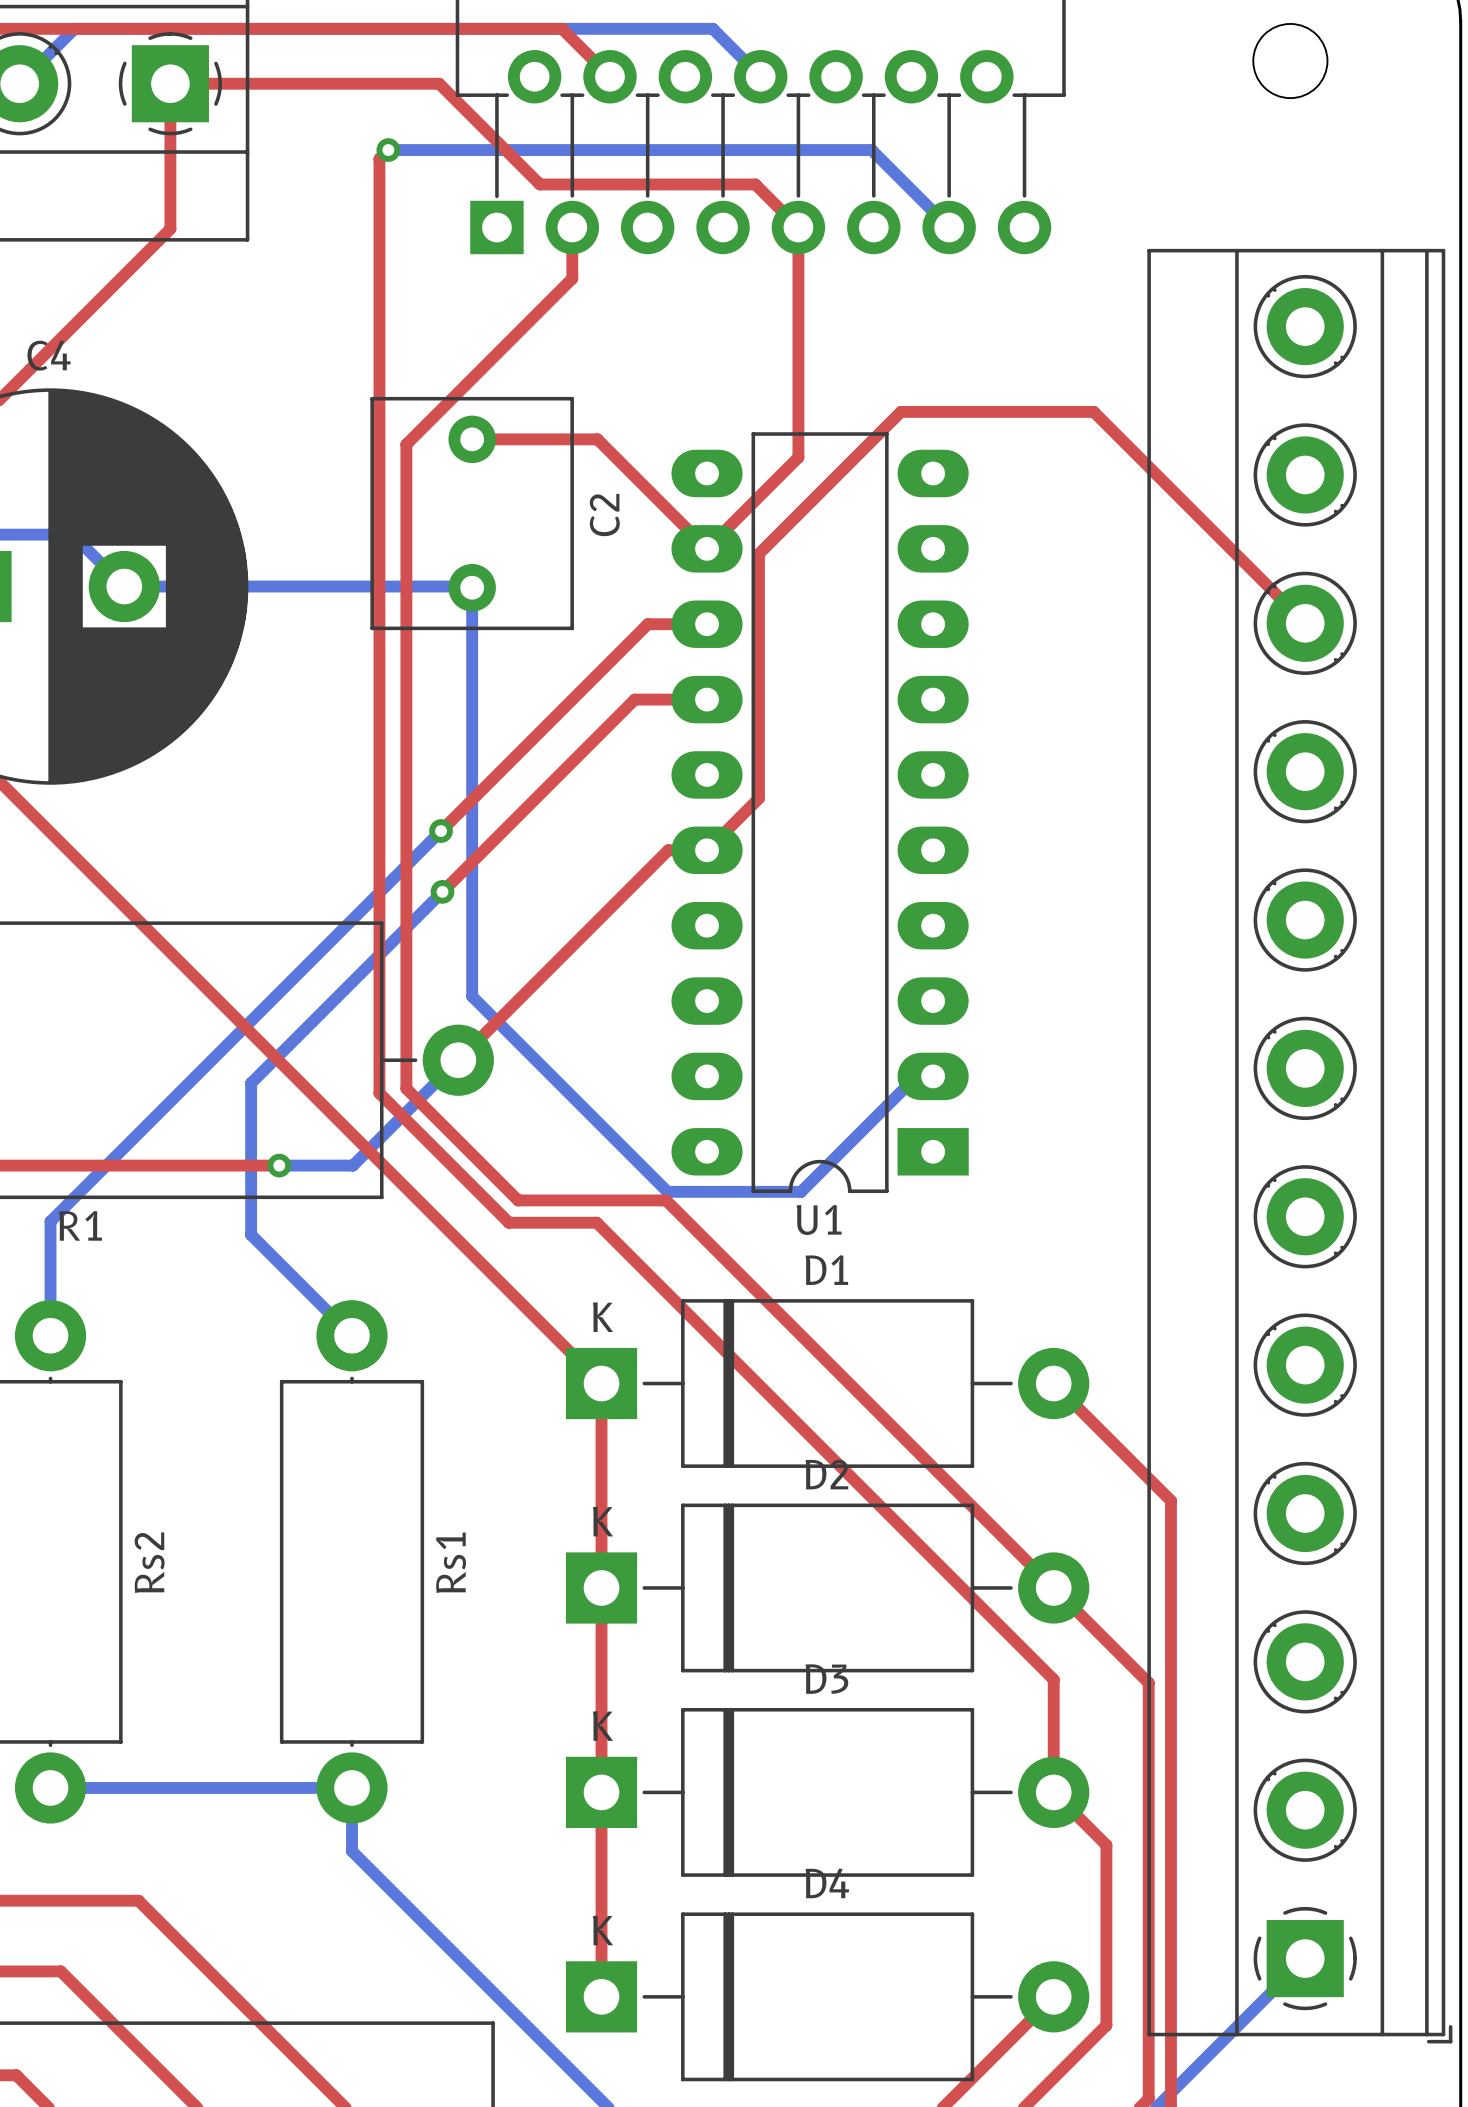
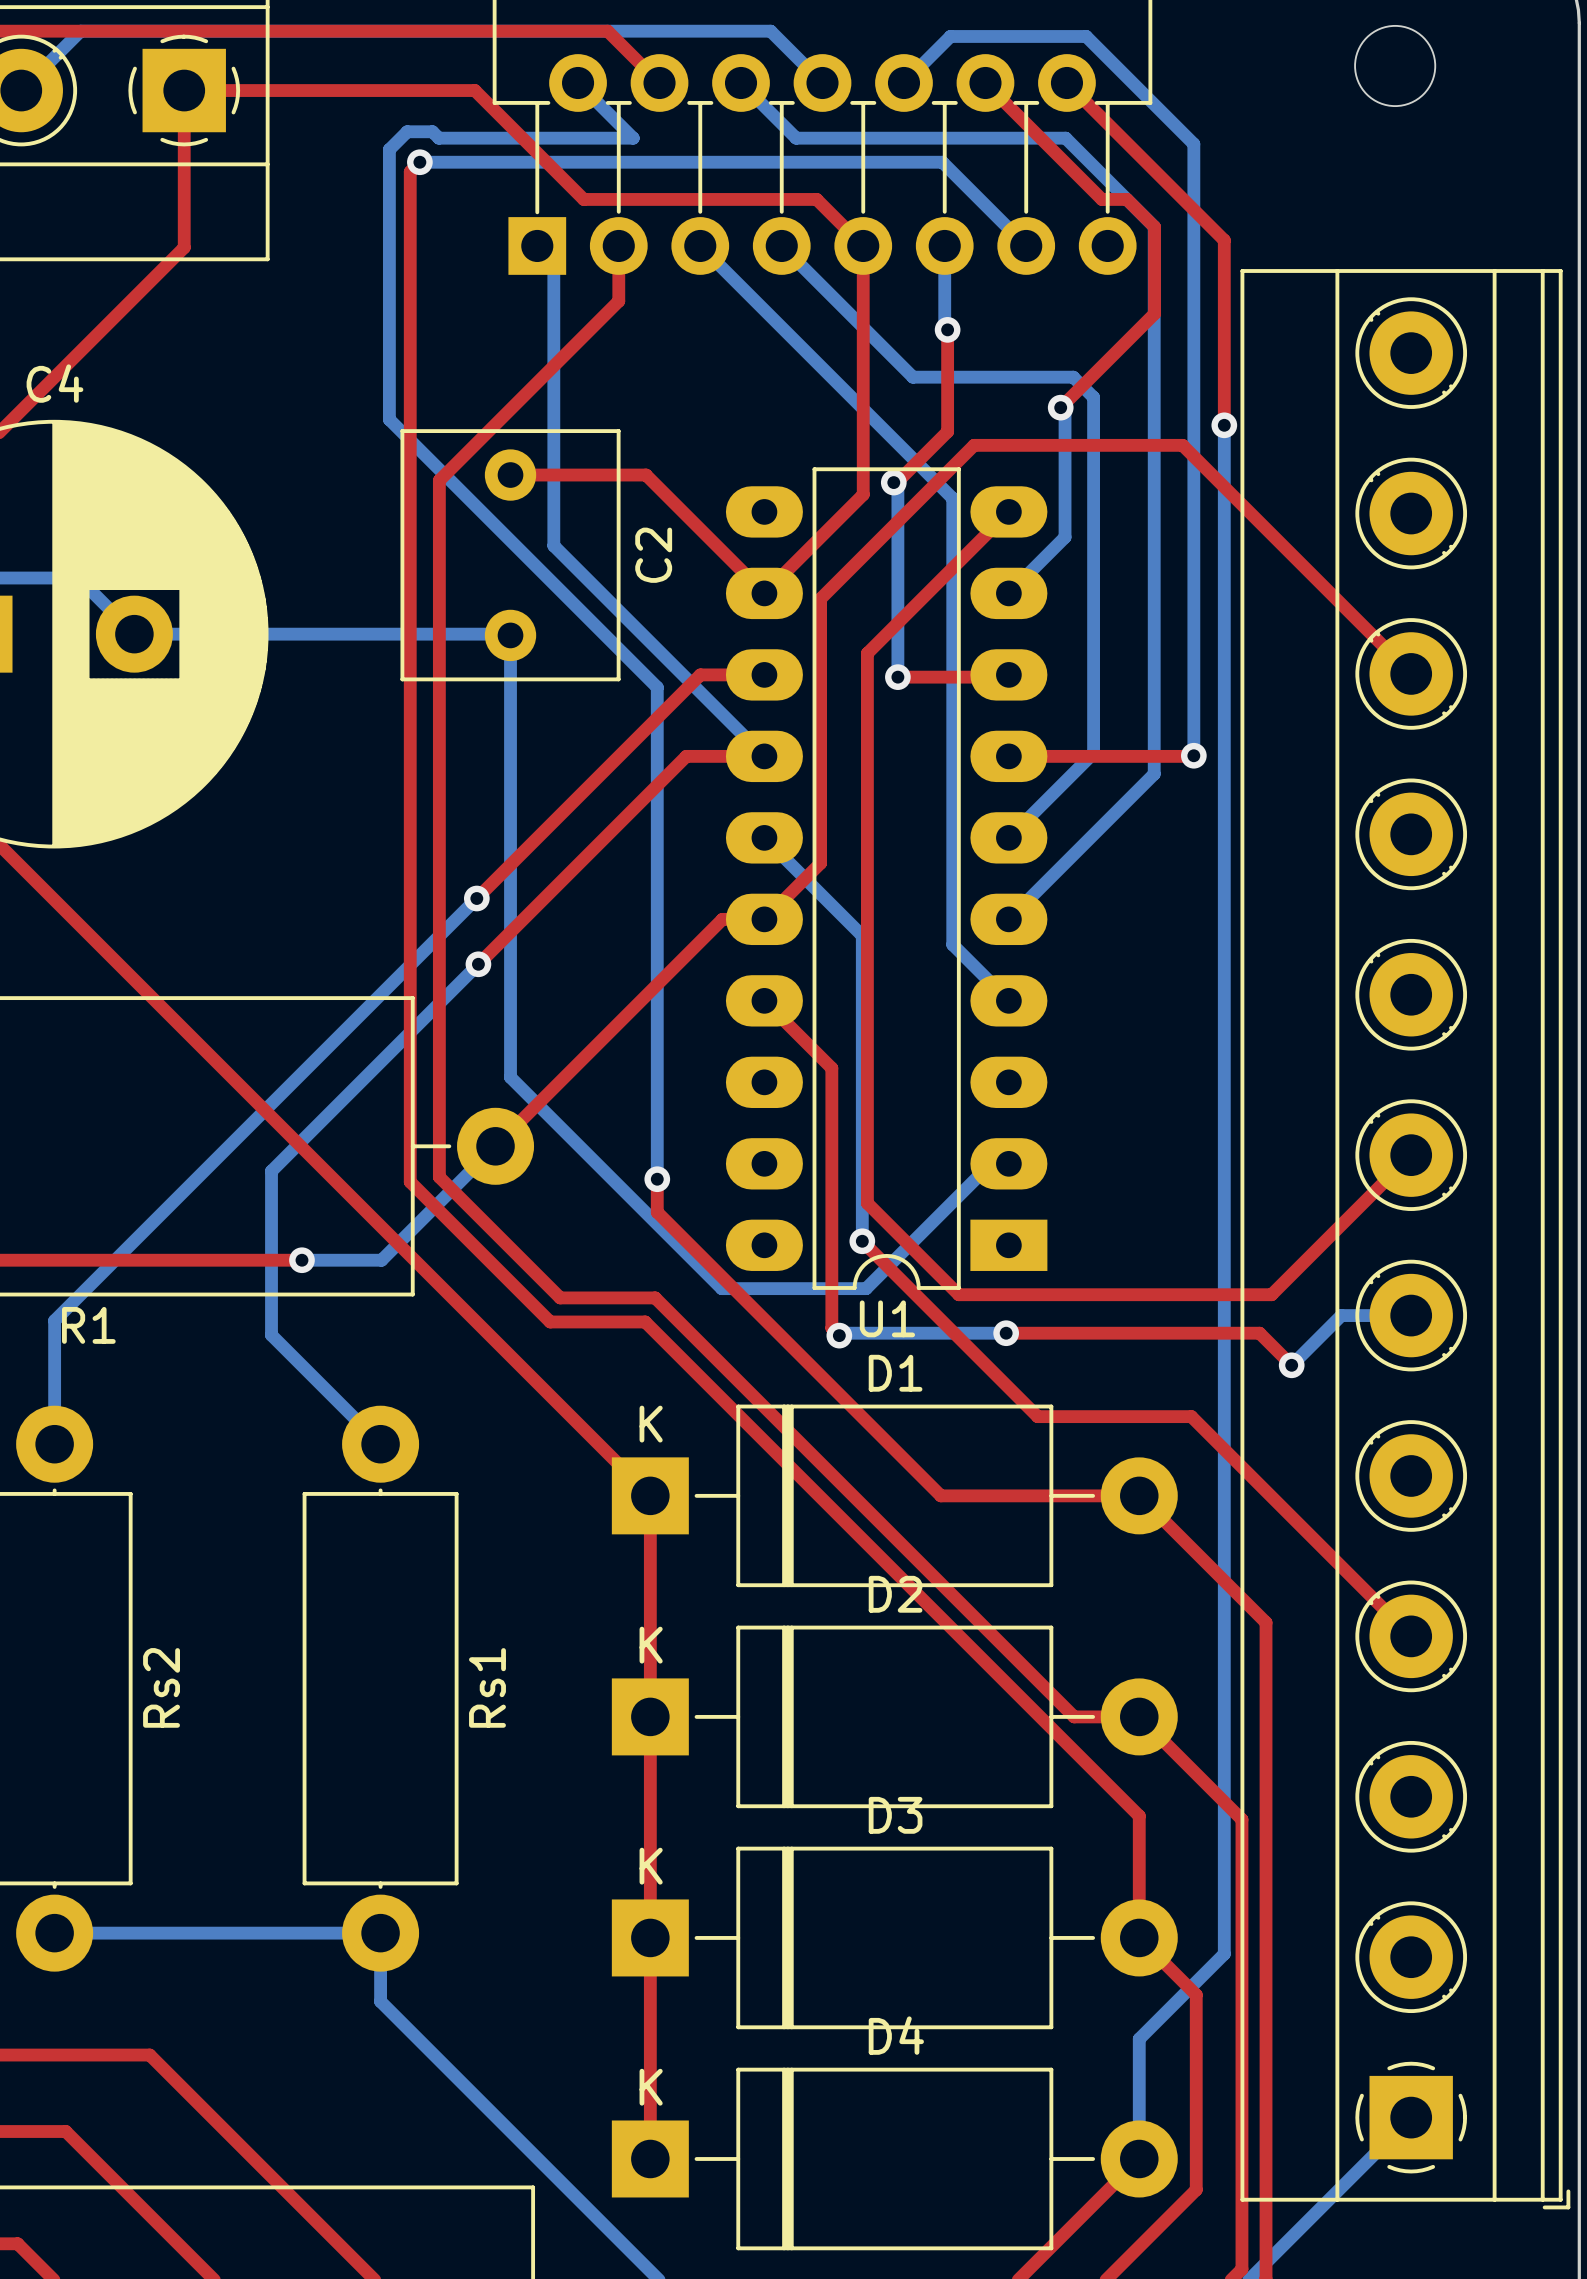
bottom track: none -> (578, 82) (633, 138) (438, 138) (432, 131) (407, 131) (389, 149) (389, 419) (657, 687) (657, 1179)
bottom track: none -> (741, 82) (796, 138) (1065, 138) (1154, 226) (1154, 774) (1008, 919)
bottom track: none -> (903, 82) (950, 36) (1086, 36) (1193, 144) (1193, 755)
top track: none -> (985, 82) (1101, 199) (1126, 199) (1154, 227) (1154, 313) (1060, 407)
top track: none -> (1066, 82) (1224, 240) (1224, 425)
bottom track: none -> (537, 245) (553, 262) (553, 545) (764, 756)
bottom track: none -> (700, 245) (952, 498) (952, 944) (1008, 1000)
bottom track: none -> (781, 245) (912, 377) (1073, 377) (1093, 397) (1093, 753) (1008, 837)
bottom track: none -> (944, 245) (944, 326) (947, 329)
top track: none -> (947, 329) (947, 431) (893, 485) (893, 482)
via: none -> (947, 329)
bottom track: none -> (1060, 407) (1065, 411) (1065, 537) (1008, 593)
via: none -> (1060, 407)
bottom track: none -> (1224, 425) (1224, 1954) (1139, 2039) (1139, 2158)
via: none -> (1224, 425)
bottom track: none -> (893, 482) (897, 486) (897, 677)
via: none -> (893, 482)
top track: none -> (1008, 511) (867, 653) (867, 1203) (958, 1294) (1271, 1294) (1411, 1155)
top track: none -> (1008, 674) (1006, 677) (897, 677)
via: none -> (897, 677)
top track: none -> (1193, 755) (1008, 756)
via: none -> (1193, 755)
bottom track: none -> (764, 837) (862, 935) (862, 1241)
top track: none -> (764, 1000) (831, 1068) (831, 1328) (839, 1335)
top track: none -> (657, 1179) (657, 1212) (940, 1495) (1139, 1495)
via: none -> (657, 1179)
top track: none -> (862, 1241) (1037, 1416) (1191, 1416) (1411, 1636)
via: none -> (862, 1241)
top track: (606, 1200) (666, 1200) (1053, 1587) -> (655, 1297) (1074, 1716) (1139, 1716)
bottom track: none -> (1411, 1315) (1341, 1315) (1291, 1365)
top track: none -> (1006, 1333) (1259, 1333) (1291, 1365)
bottom track: none -> (1006, 1333) (841, 1333) (839, 1335)
via: none -> (1006, 1333)
via: none -> (839, 1335)
via: none -> (1291, 1365)

